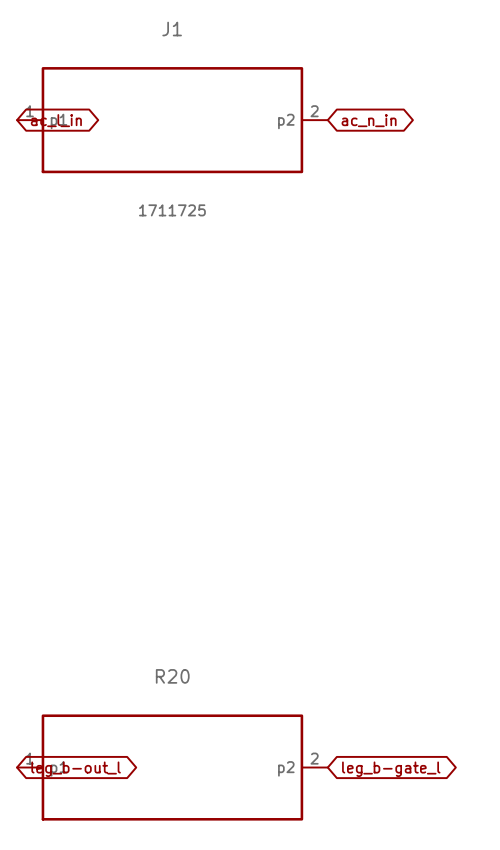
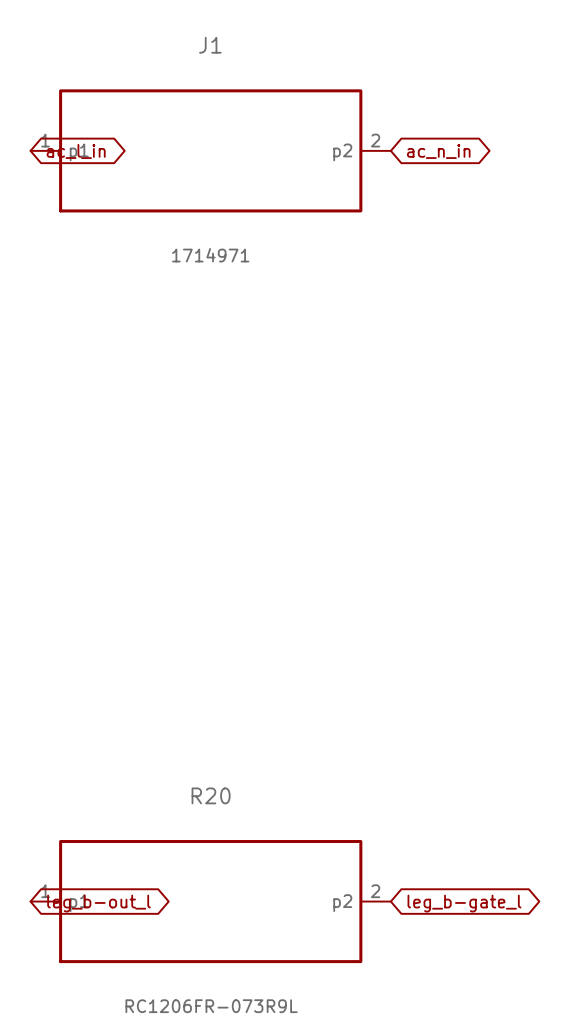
J1 value: 1711725 (172, 210) -> 1714971 (210, 255)

